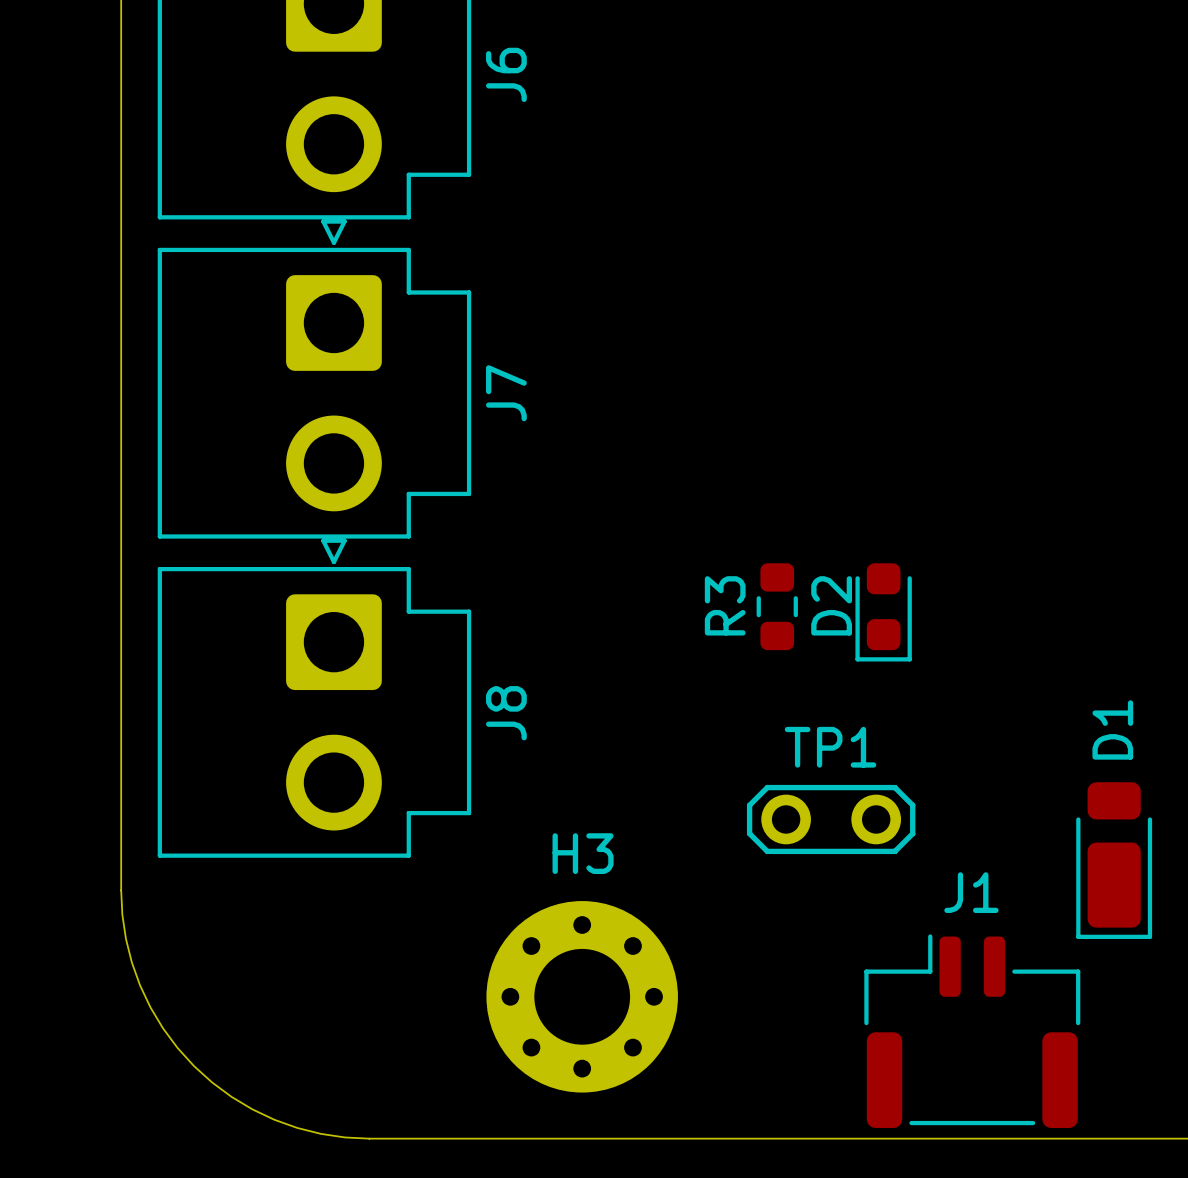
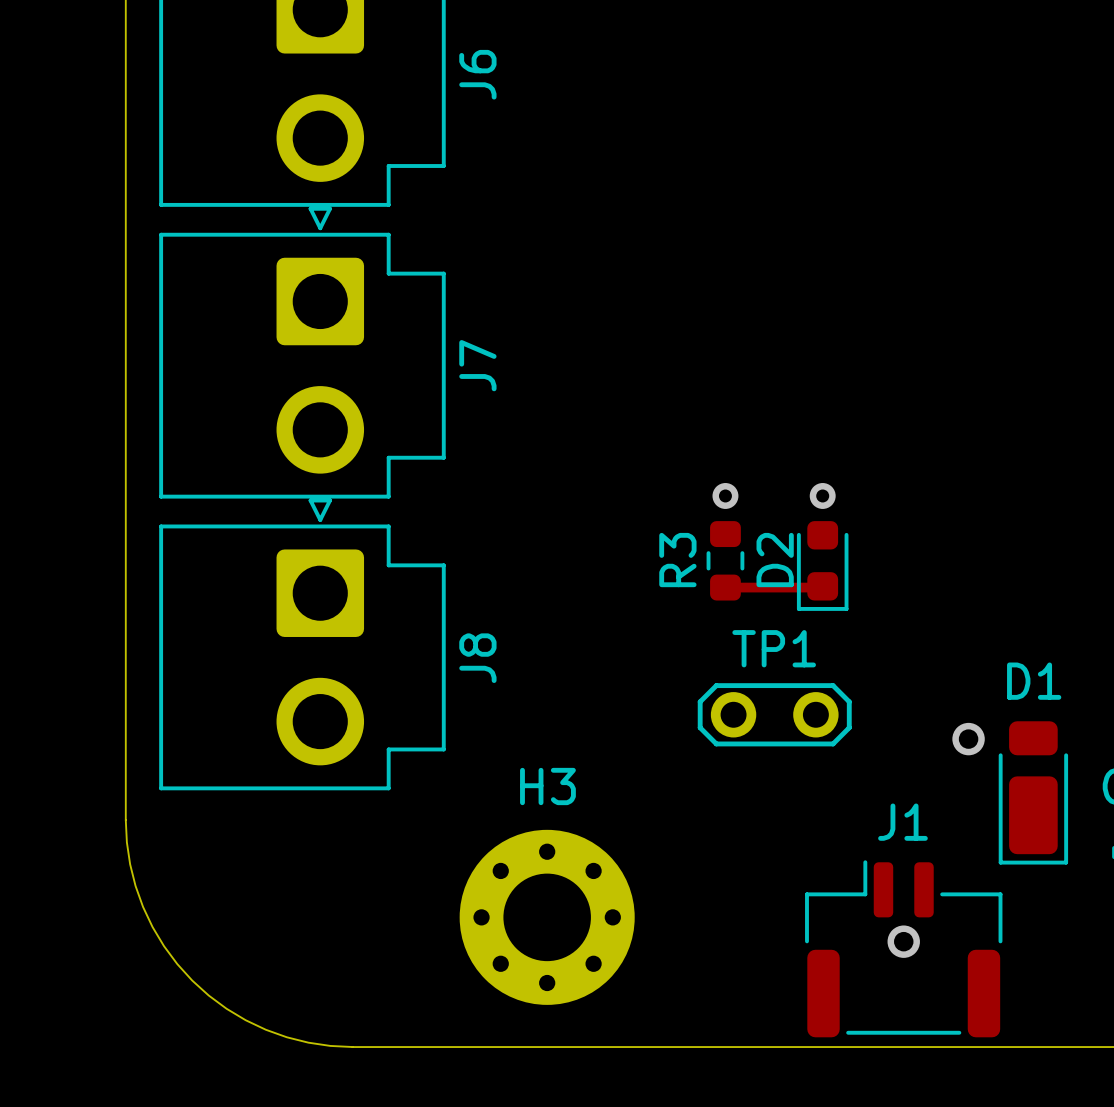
via: none -> (725, 495)
via: none -> (822, 495)
track: none -> (822, 586) (725, 587)
D1 name rotation: 0° (1112, 729) -> 90° clockwise (1034, 681)
via: none -> (968, 739)
TP1 position: (831, 819) -> (774, 714)
via: none -> (903, 941)

